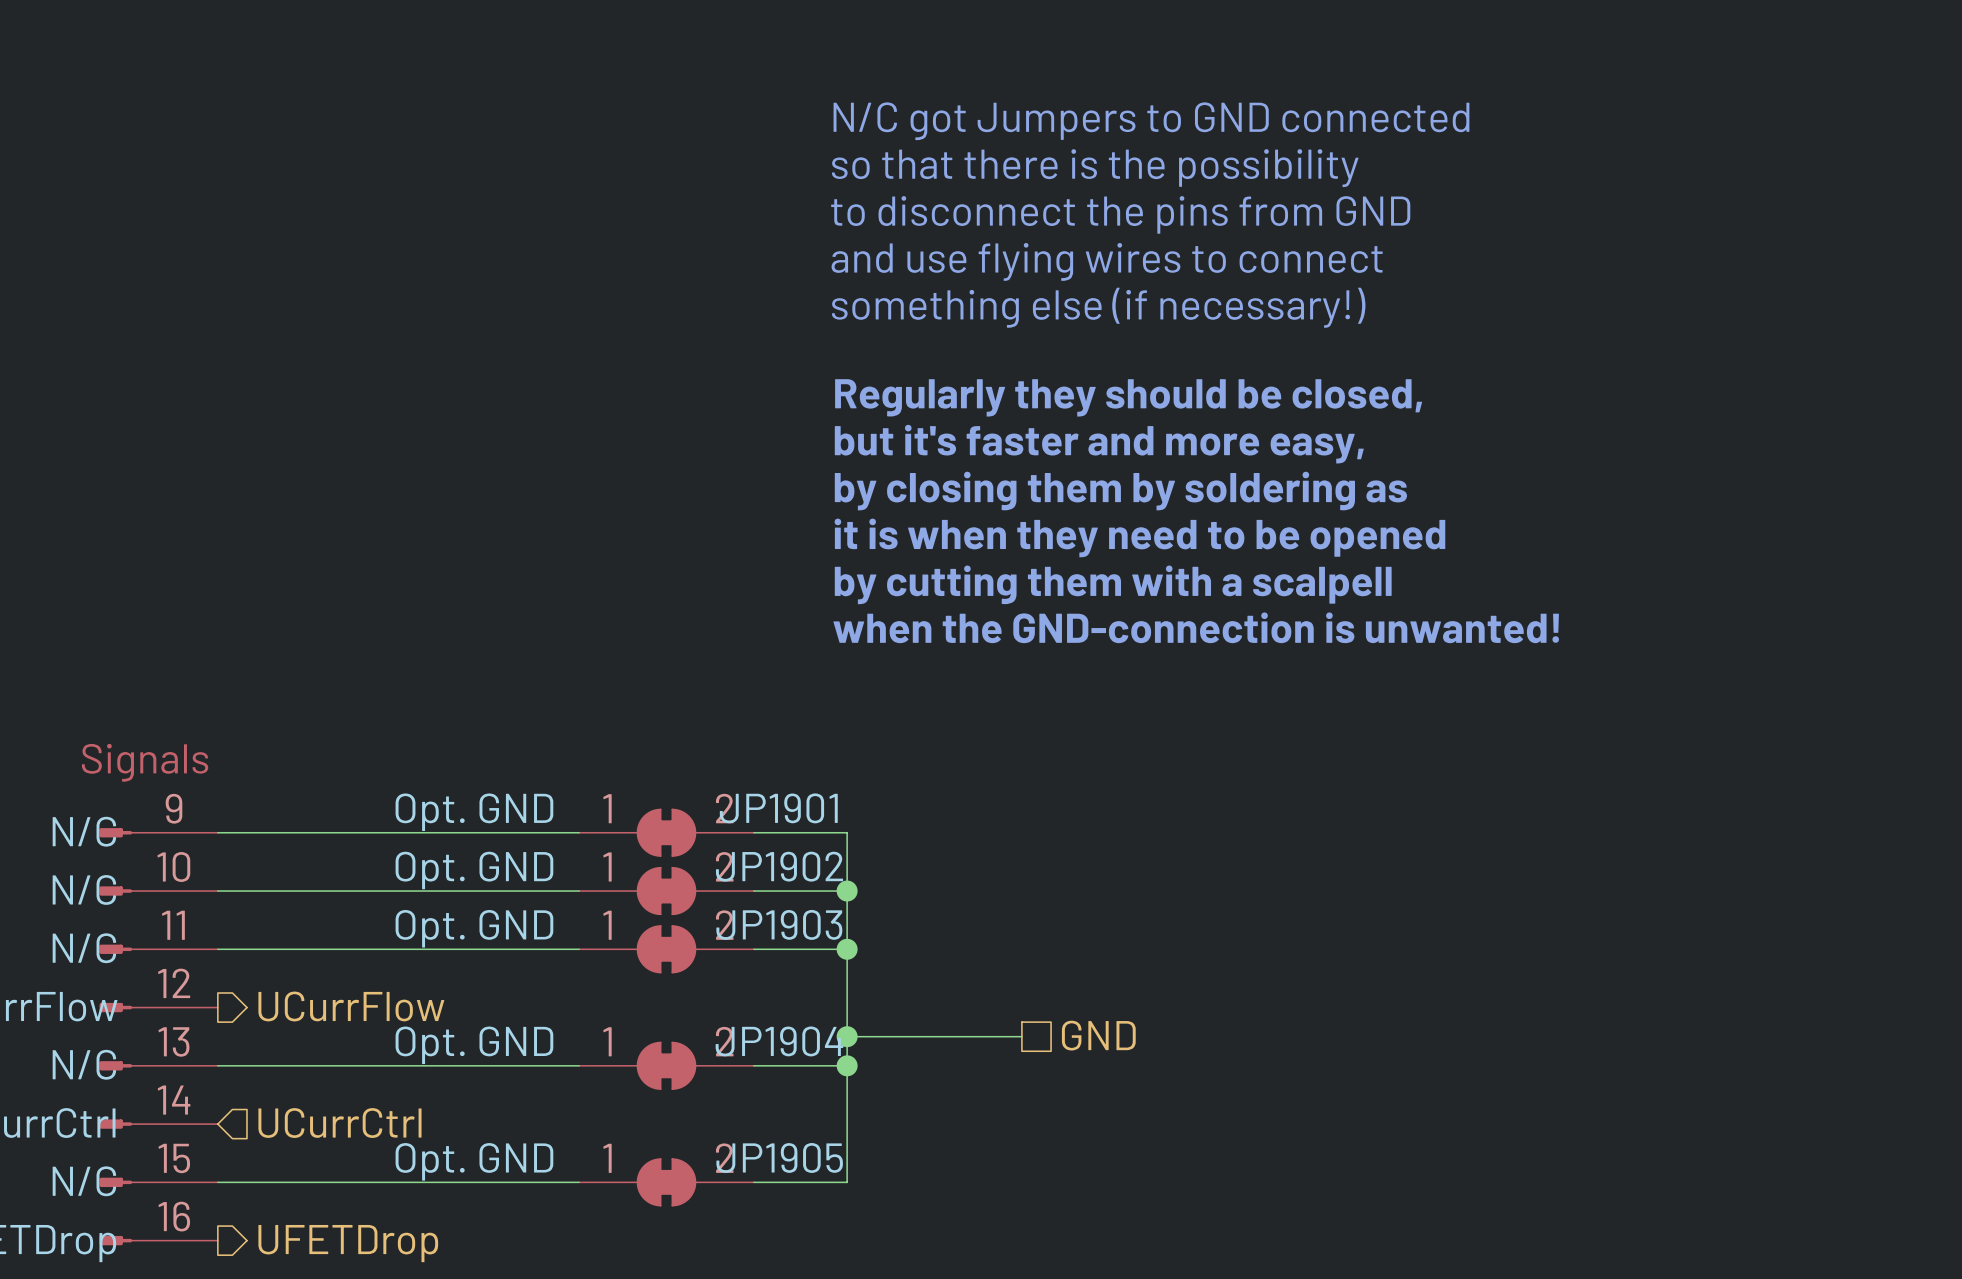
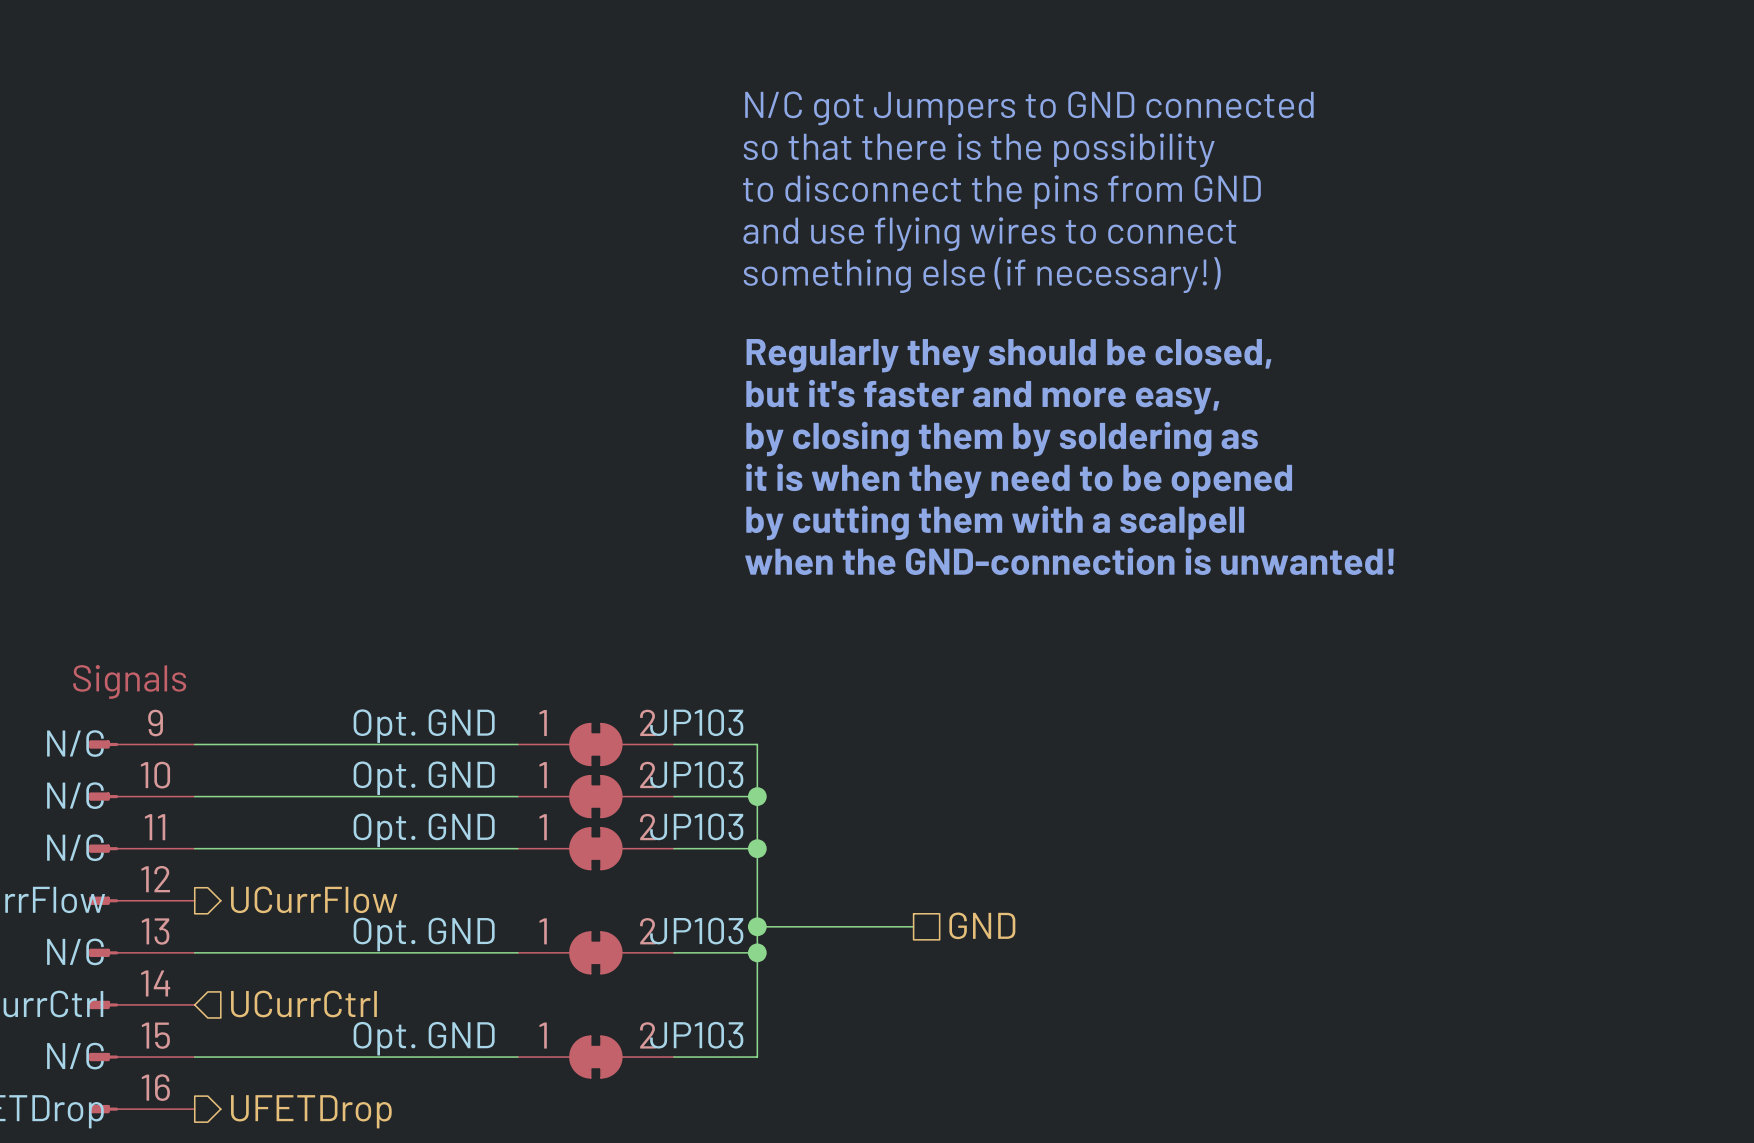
JP1901 name: JP1901 (778, 808) -> JP103 (696, 722)
JP1902 name: JP1902 (779, 866) -> JP103 (696, 774)
JP1903 name: JP1903 (779, 924) -> JP103 (696, 826)
JP1904 name: JP1904 (779, 1041) -> JP103 (696, 931)
JP1905 name: JP1905 (779, 1157) -> JP103 (696, 1035)

